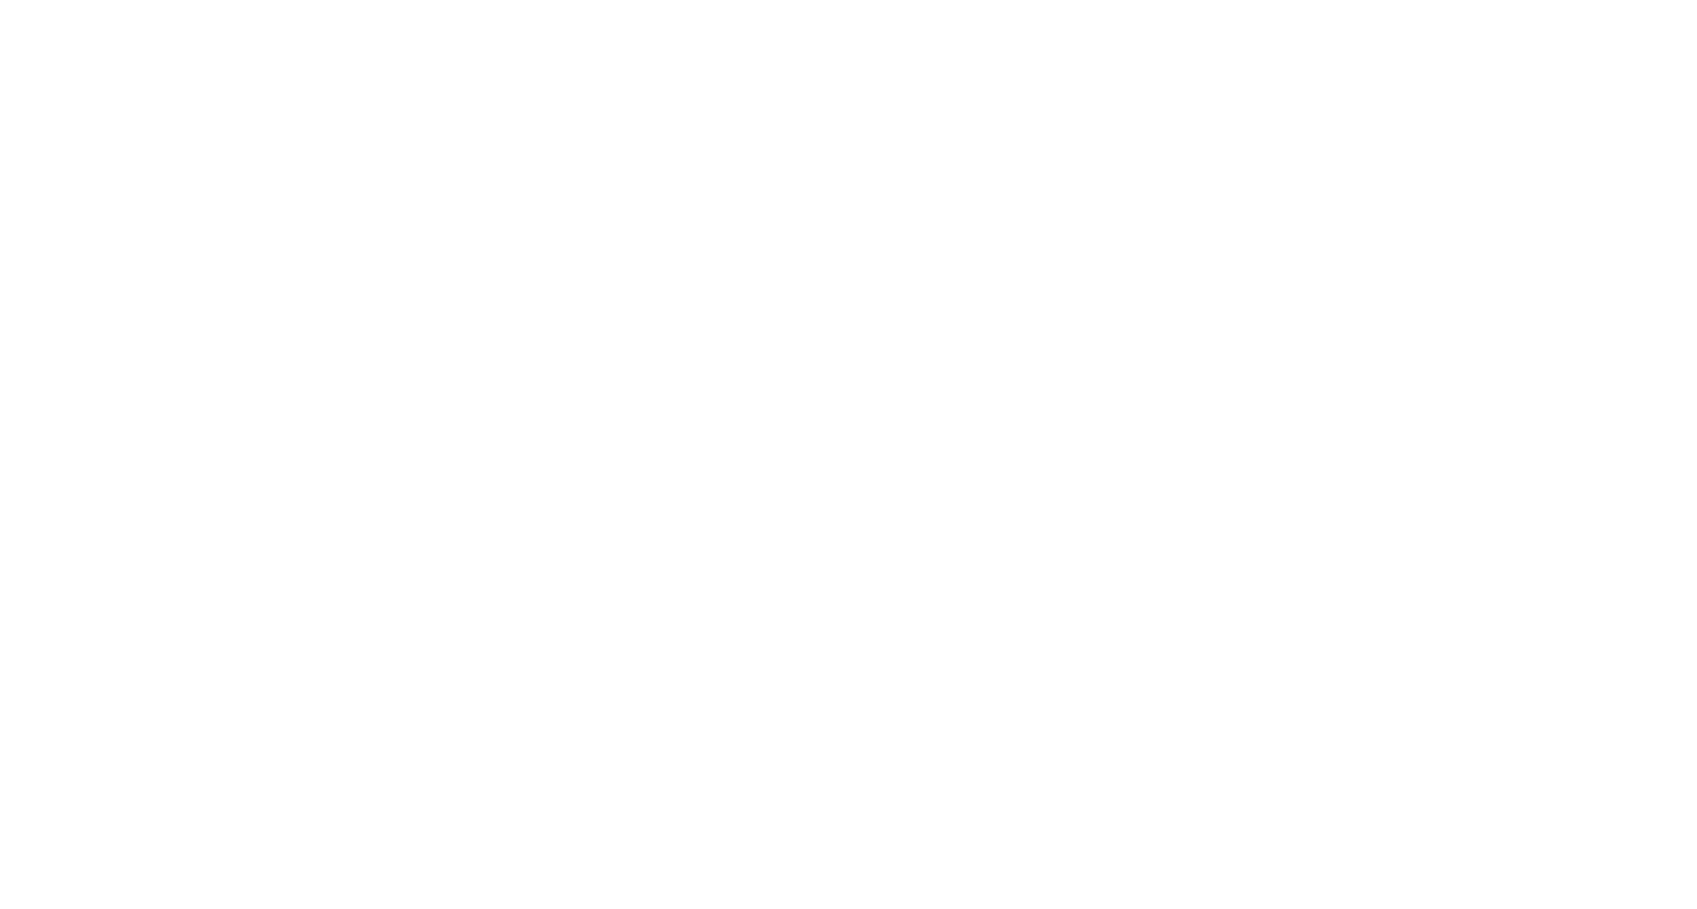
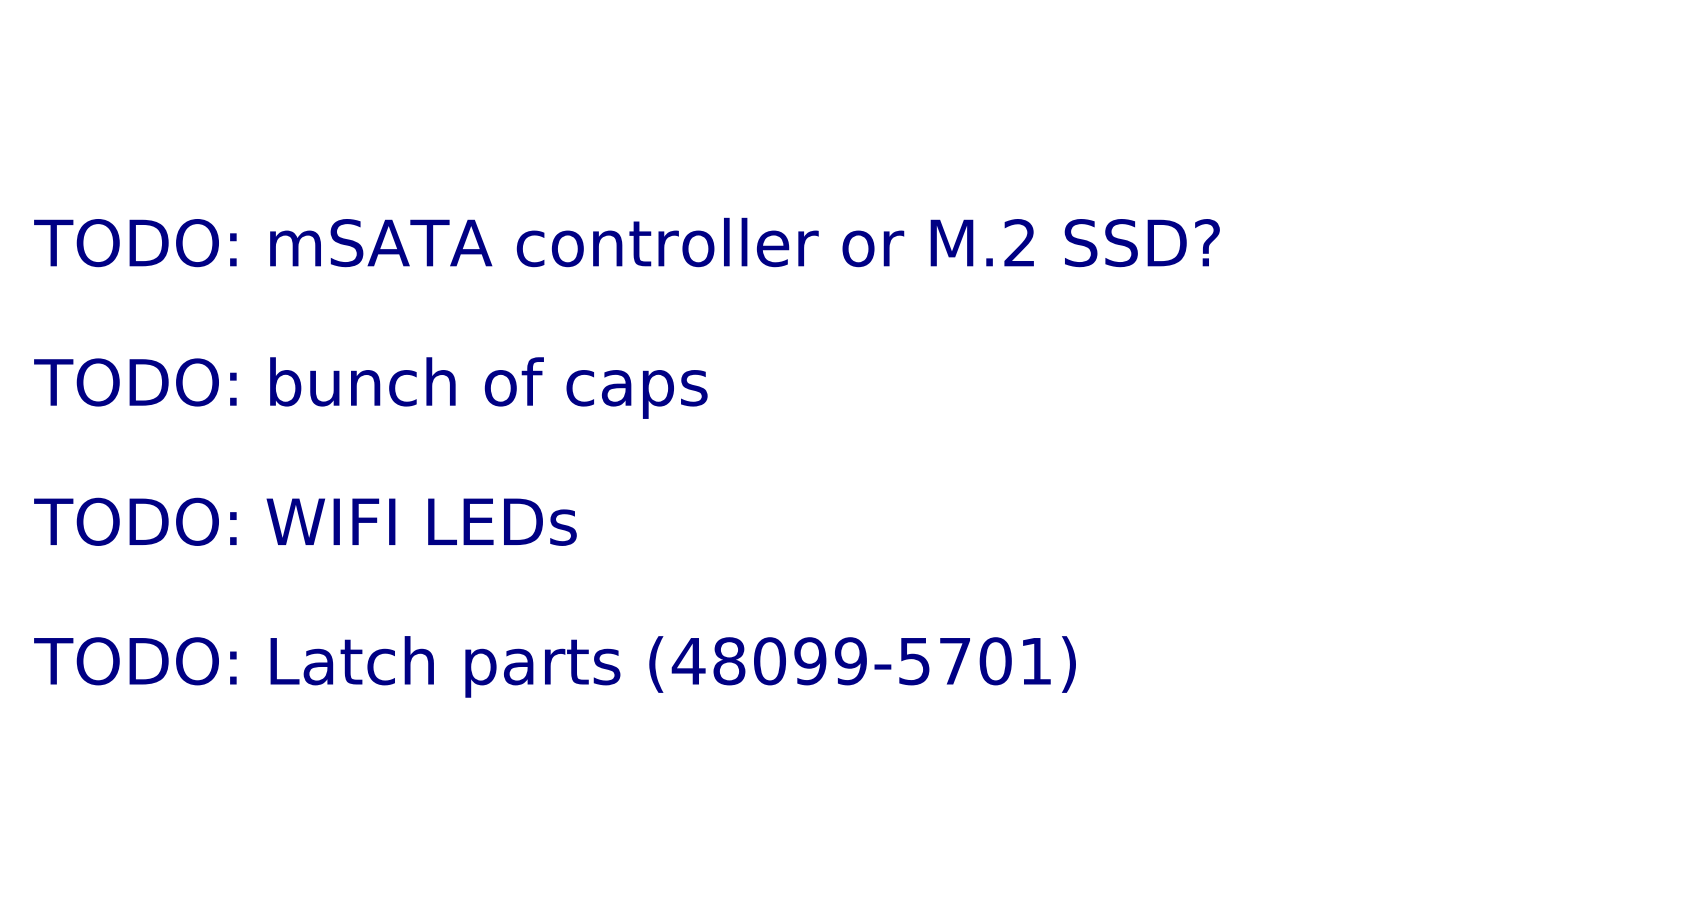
text: none -> TODO: mSATA controller or M.2 SSD? (627, 242)
text: none -> TODO: bunch of caps (370, 388)
text: none -> TODO: WIFI LEDs (305, 521)
text: none -> TODO: Latch parts (48099-5701) (555, 666)

